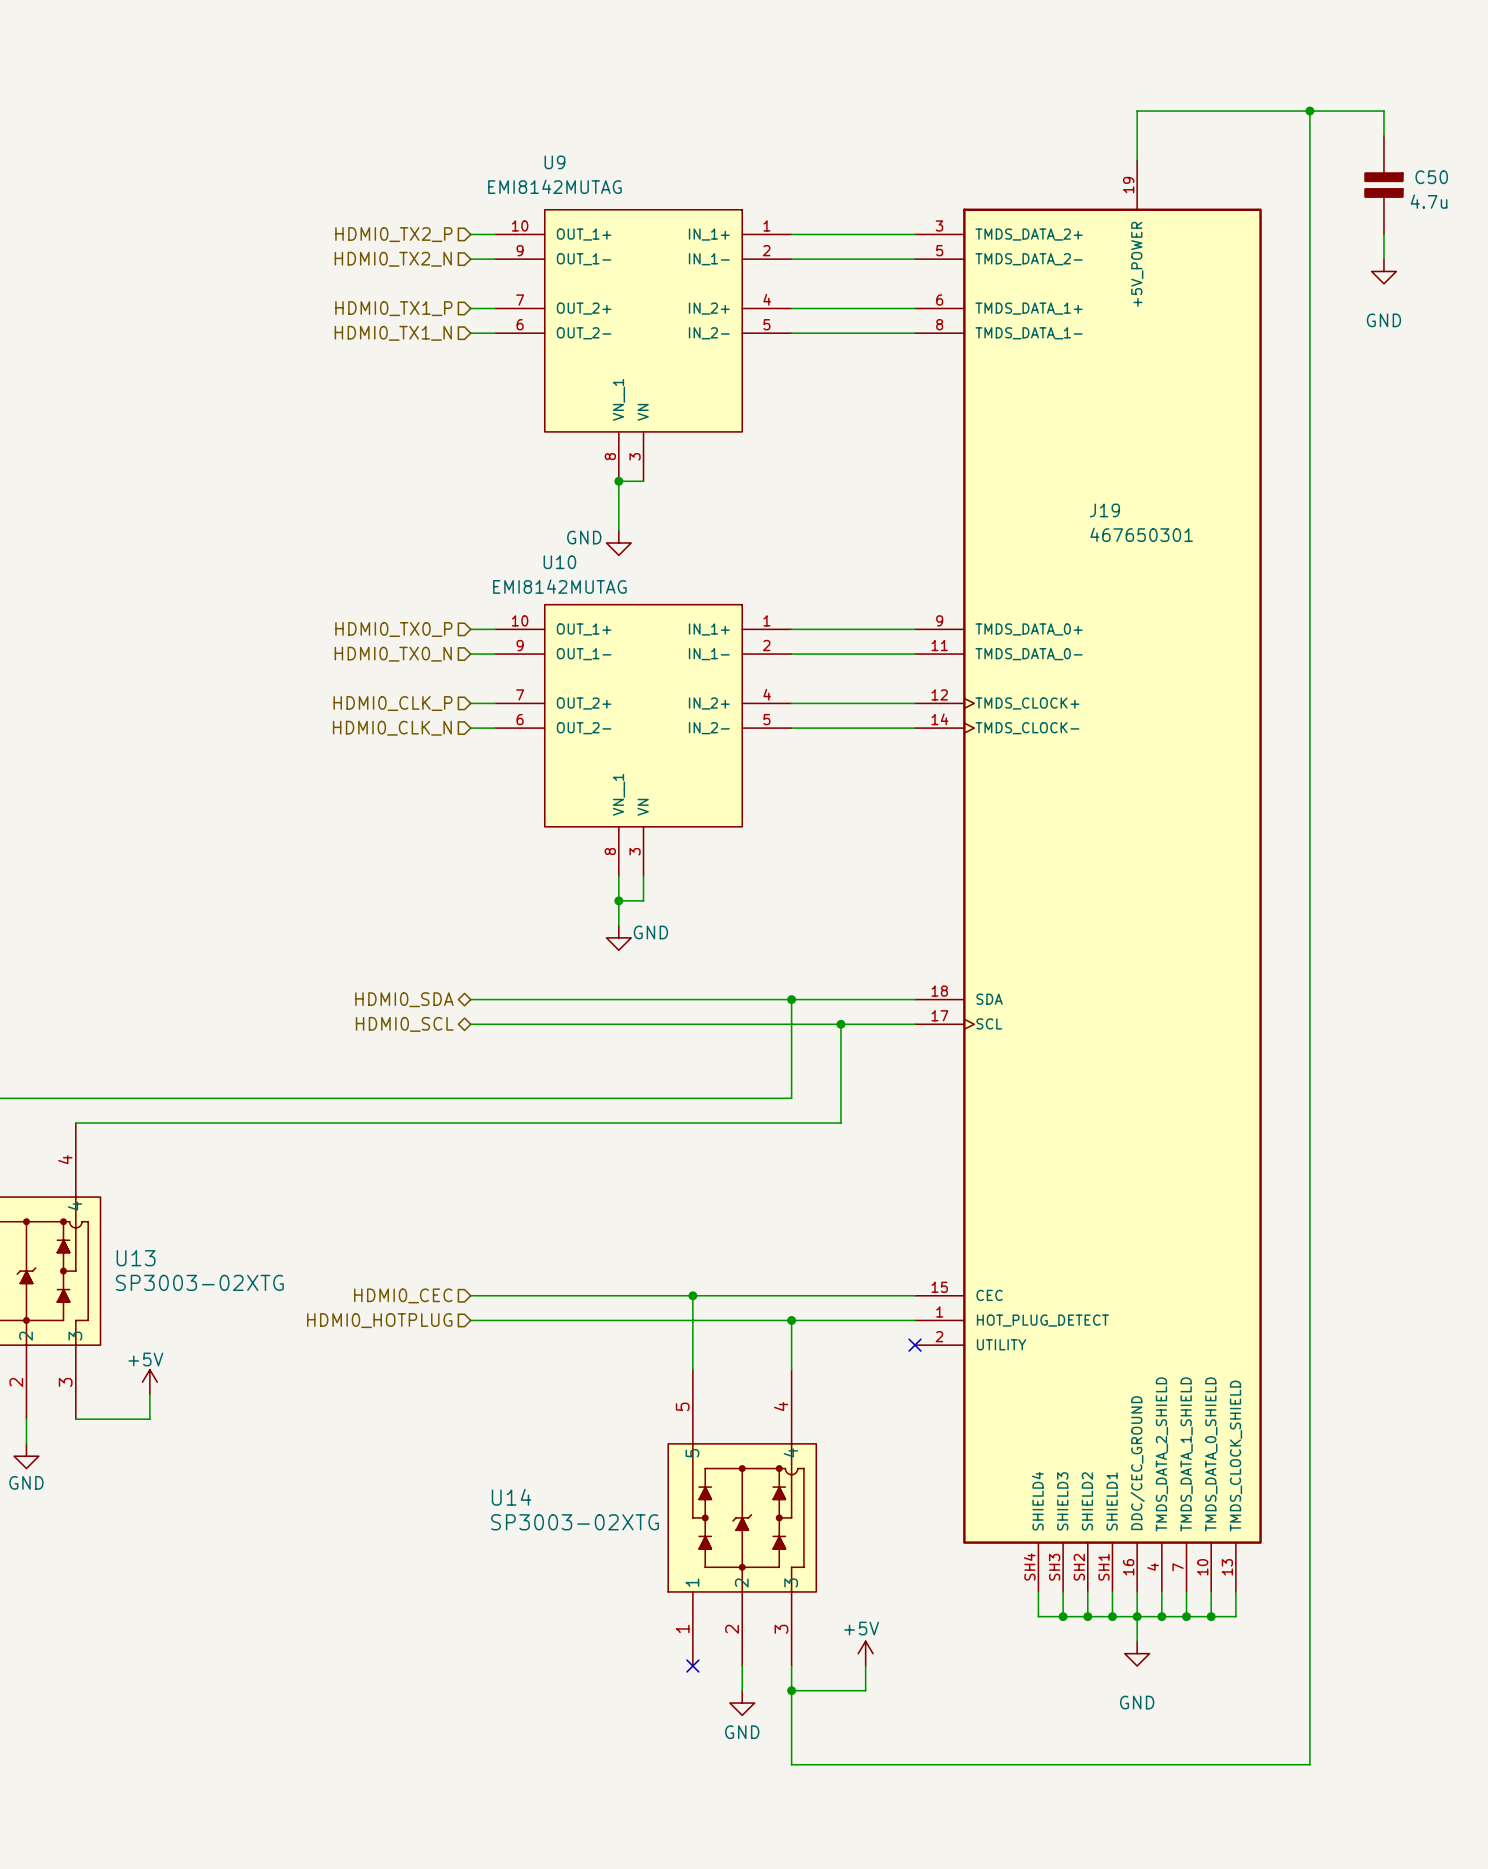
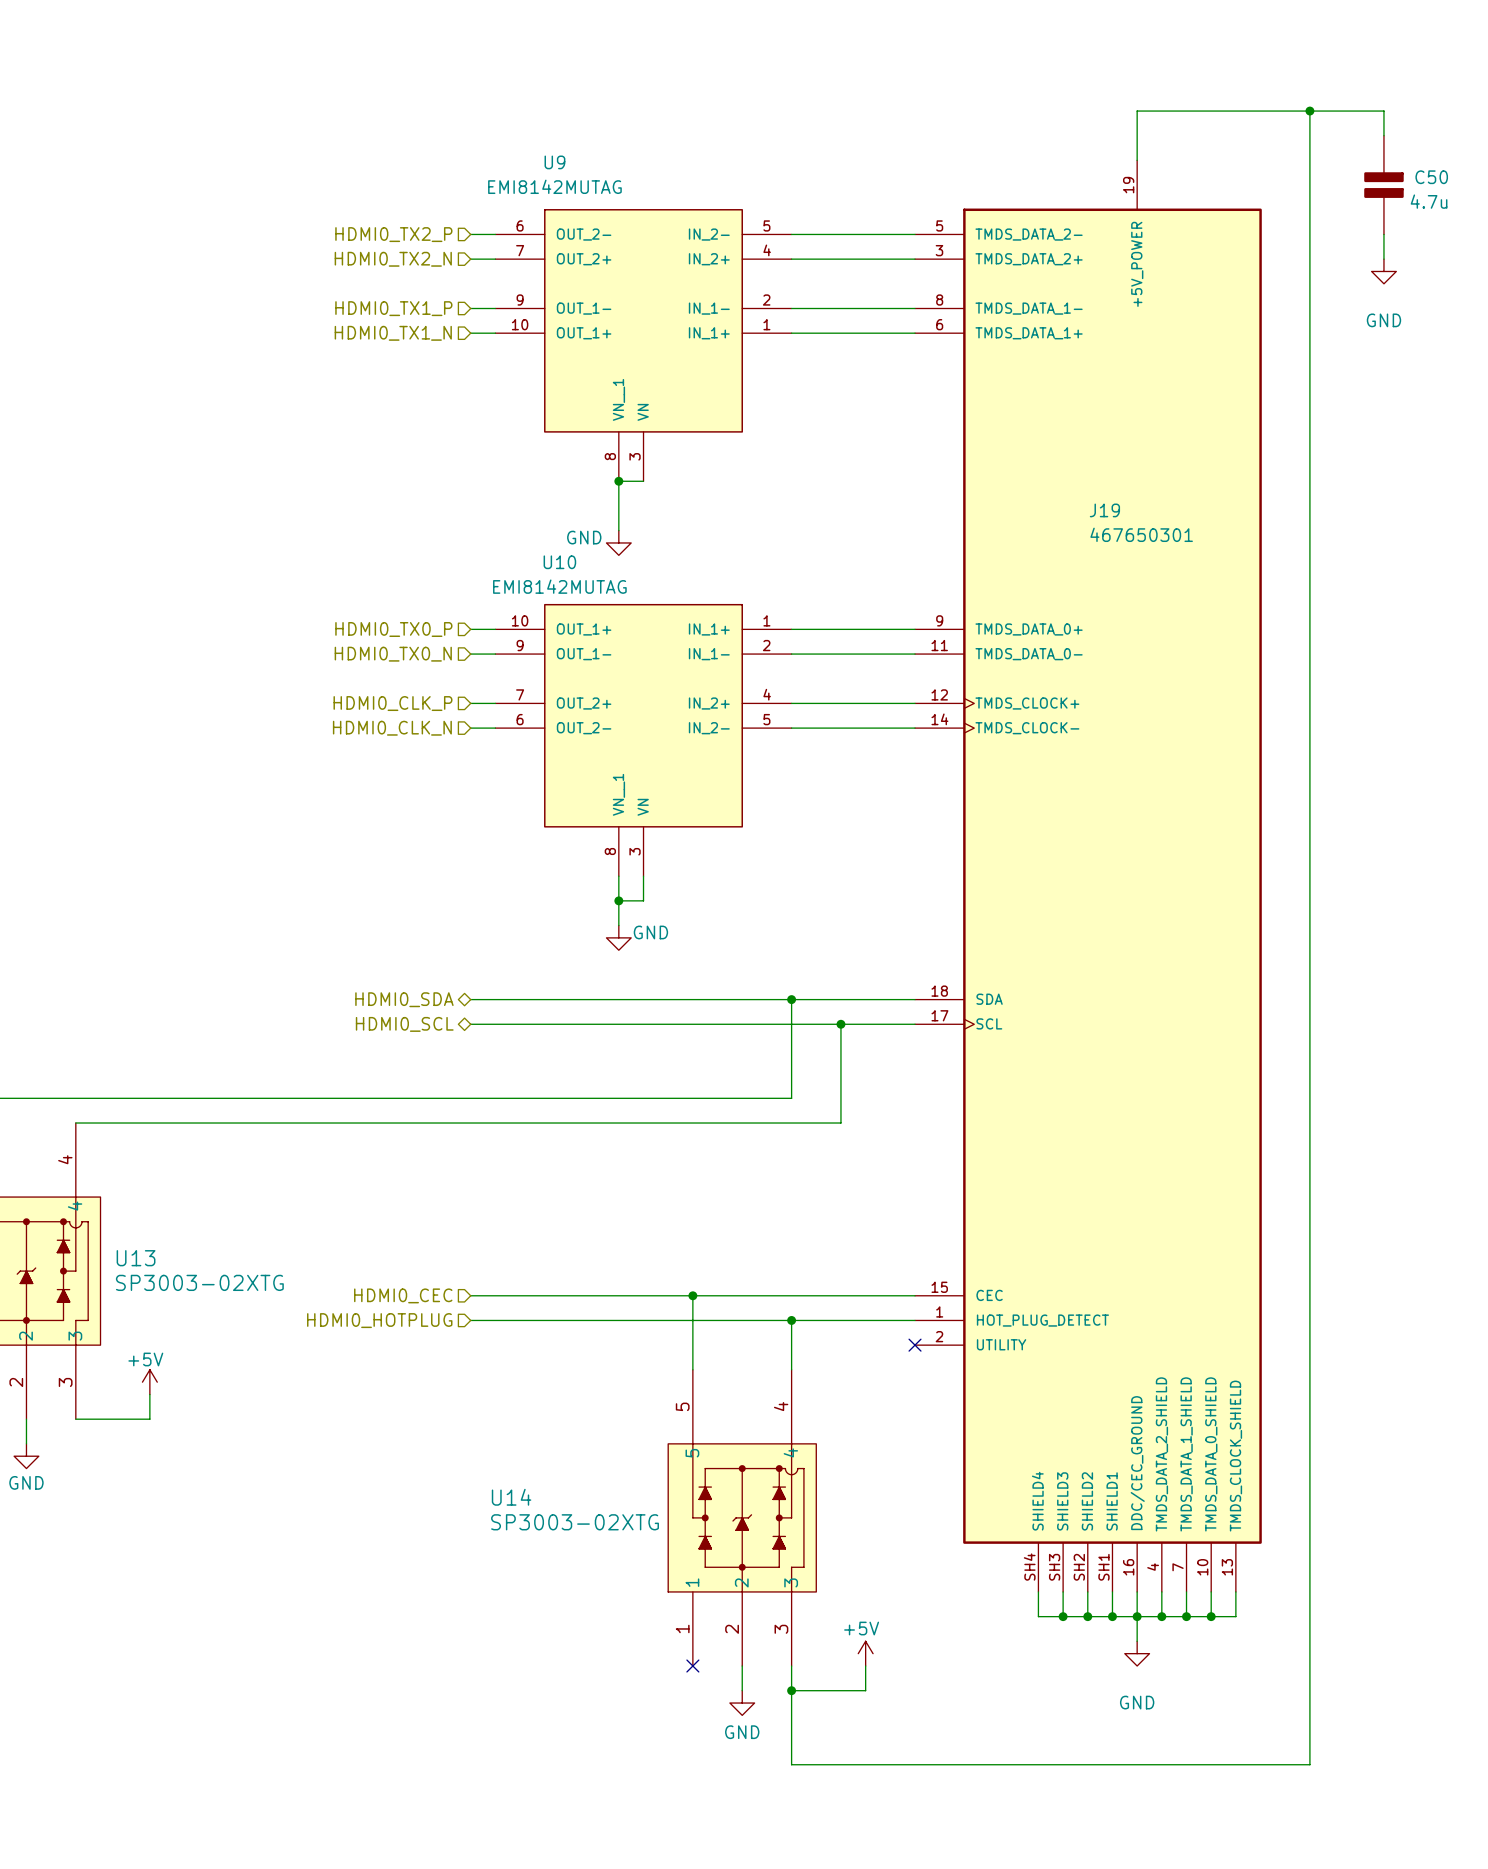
U9 symbol: [495, 209, 792, 482] -> [495, 209, 792, 482]
J19 pin number: 3 (939, 225) -> 5 (939, 225)
J19 pin name: TMDS_DATA_2+ (1029, 234) -> TMDS_DATA_2- (1029, 234)
J19 pin number: 5 (939, 250) -> 3 (939, 250)
J19 pin name: TMDS_DATA_2- (1029, 259) -> TMDS_DATA_2+ (1029, 259)
J19 pin number: 6 (939, 300) -> 8 (939, 300)
J19 pin name: TMDS_DATA_1+ (1029, 308) -> TMDS_DATA_1- (1029, 308)
J19 pin number: 8 (939, 324) -> 6 (939, 324)
J19 pin name: TMDS_DATA_1- (1029, 333) -> TMDS_DATA_1+ (1029, 333)

